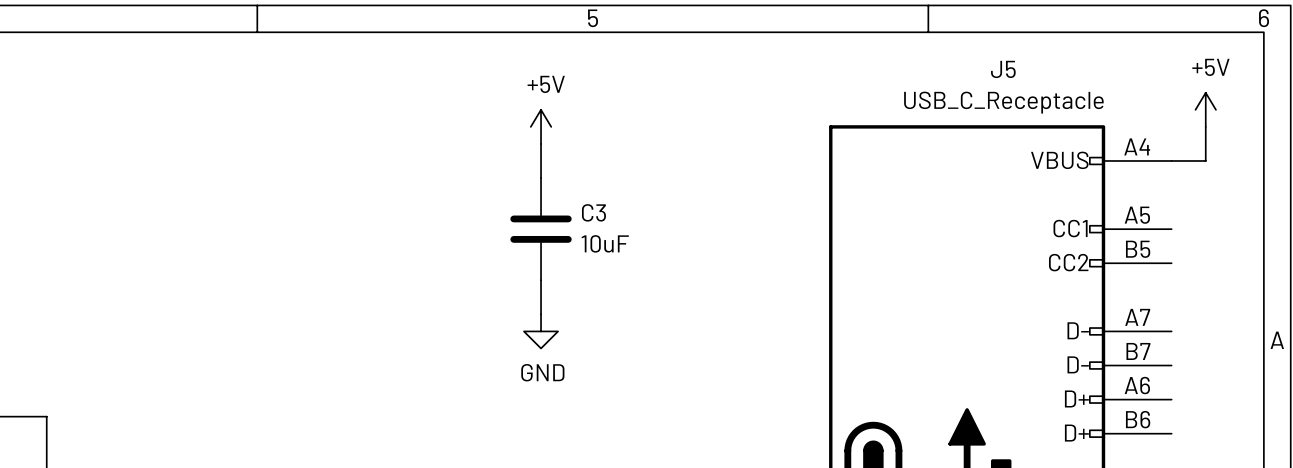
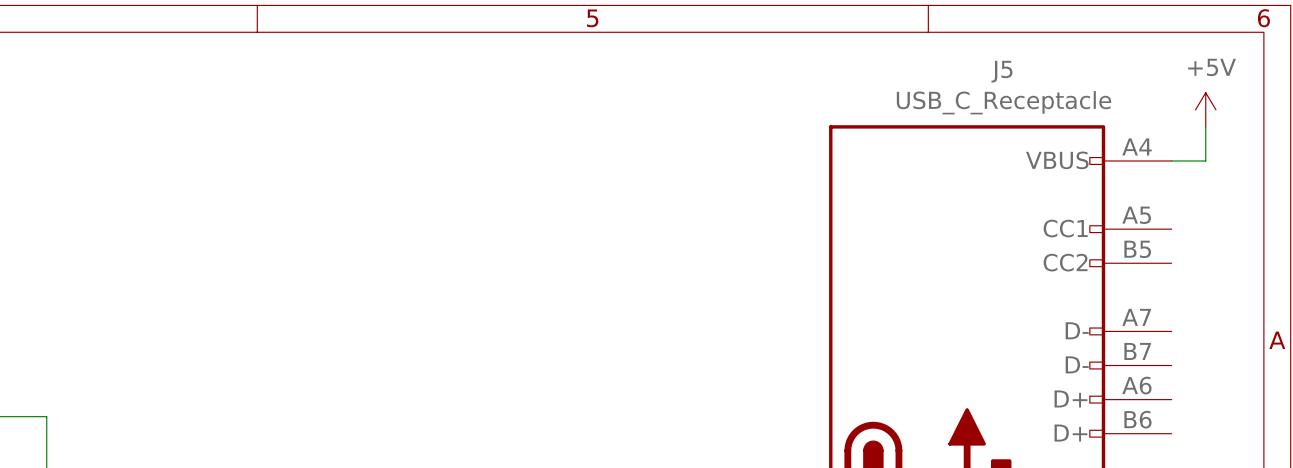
power symbol: +5V (541, 126) -> none
wire: (541, 143) (541, 178) -> none
C3: 10uF (541, 229) -> none
wire: (541, 280) (541, 314) -> none
power symbol: GND (541, 331) -> none

